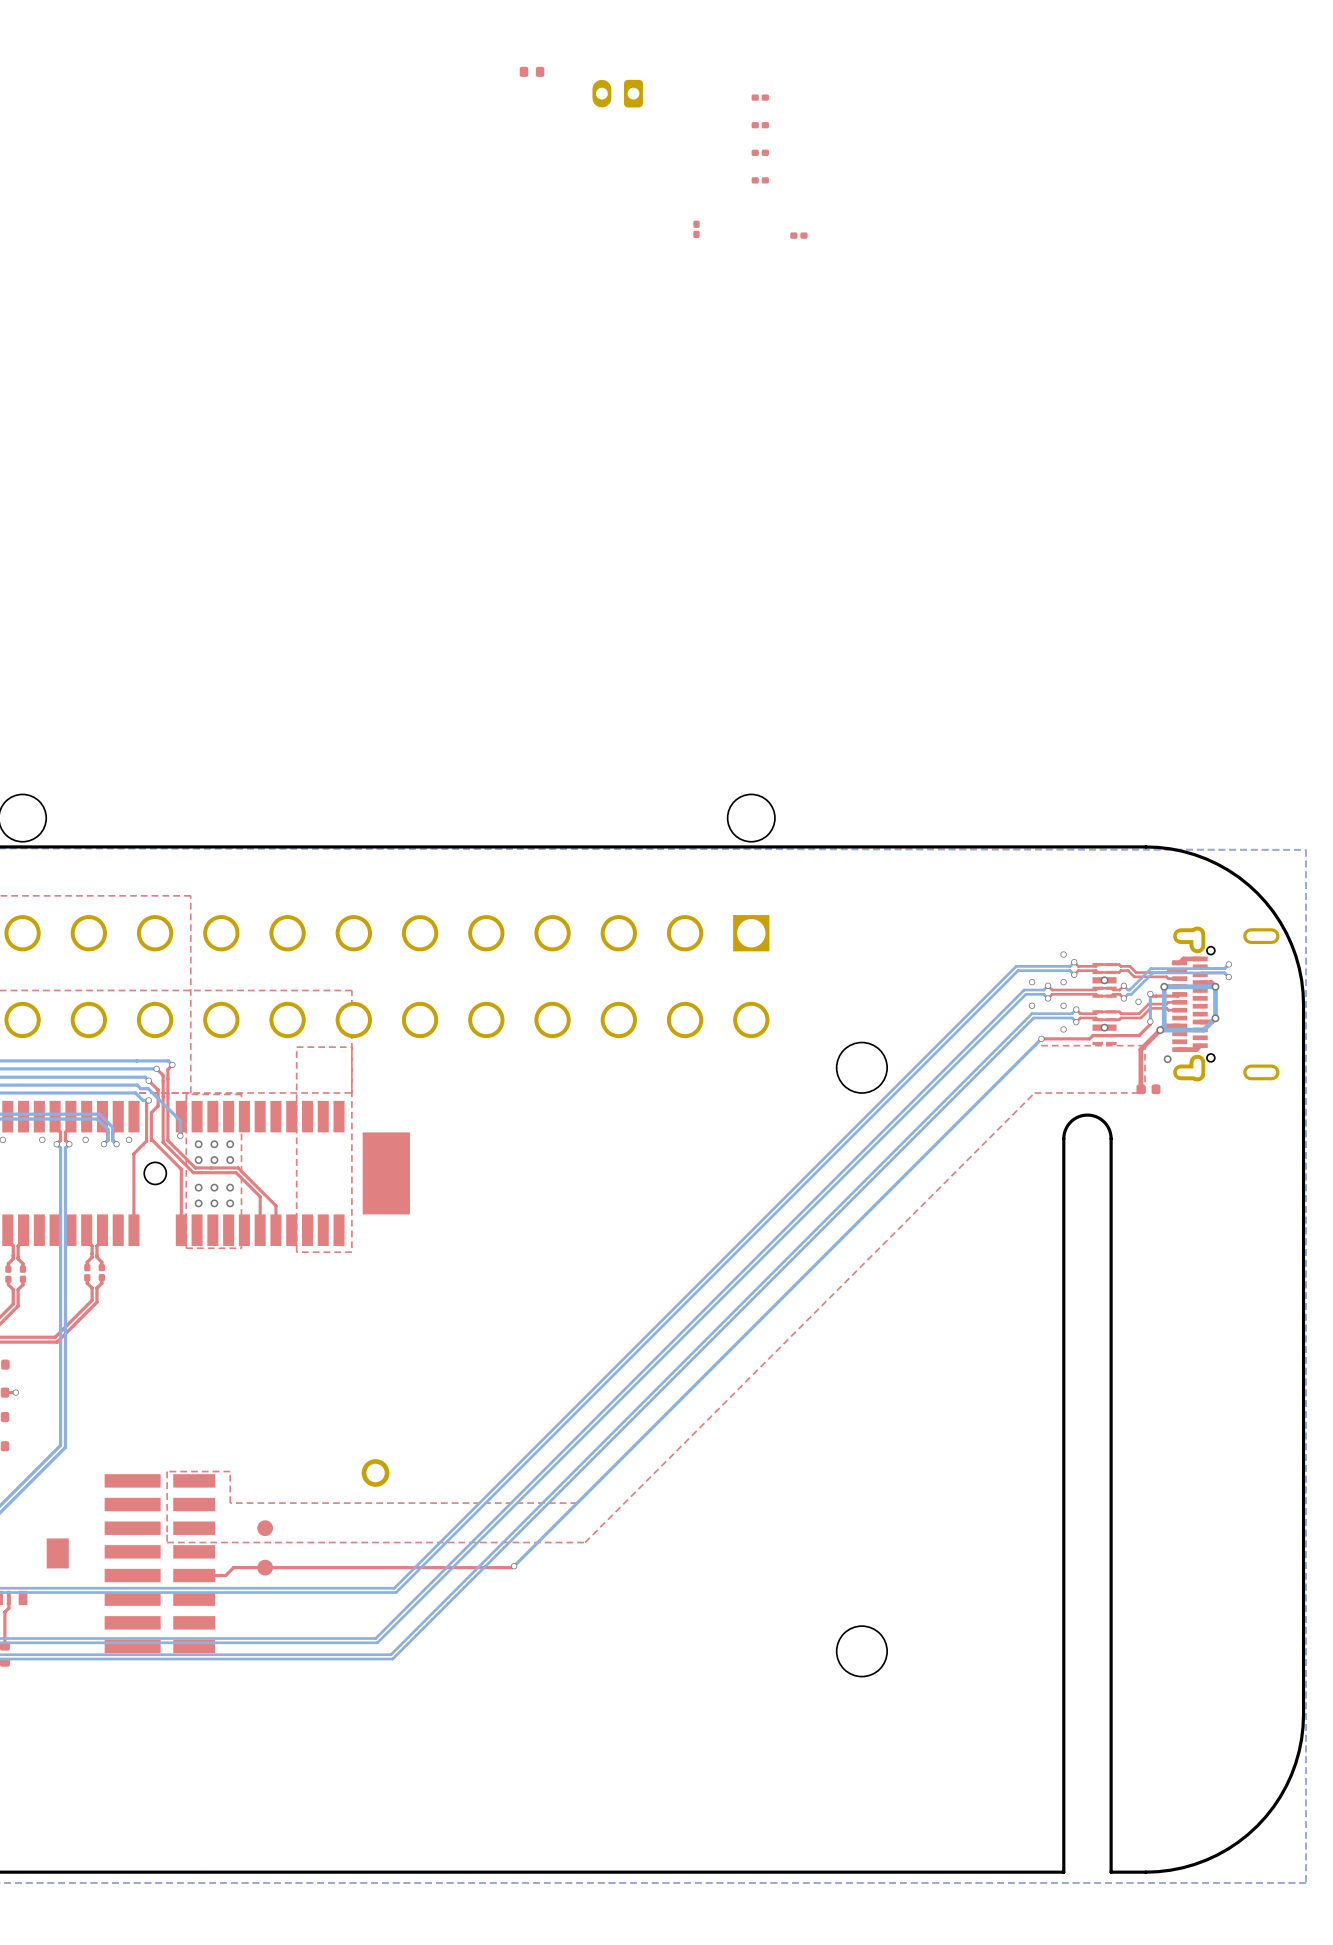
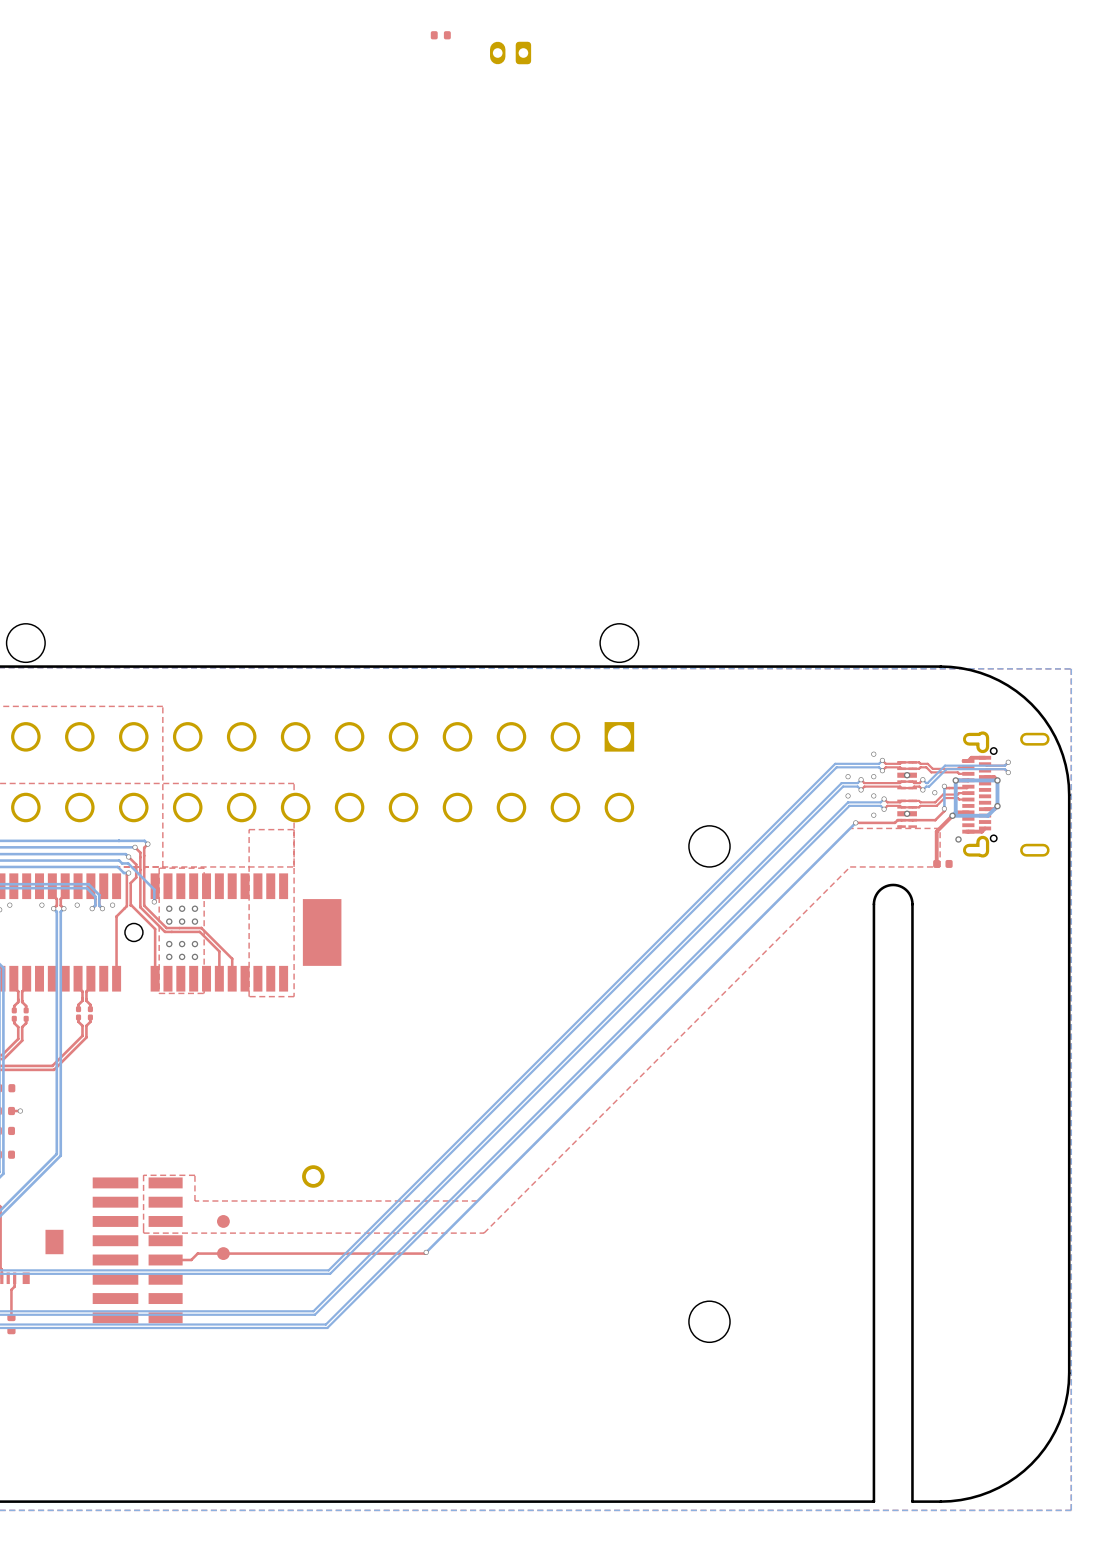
part: (760, 97) -> none
part: (760, 125) -> none
part: (760, 152) -> none
part: (760, 180) -> none
part: (696, 229) -> none
part: (798, 235) -> none

